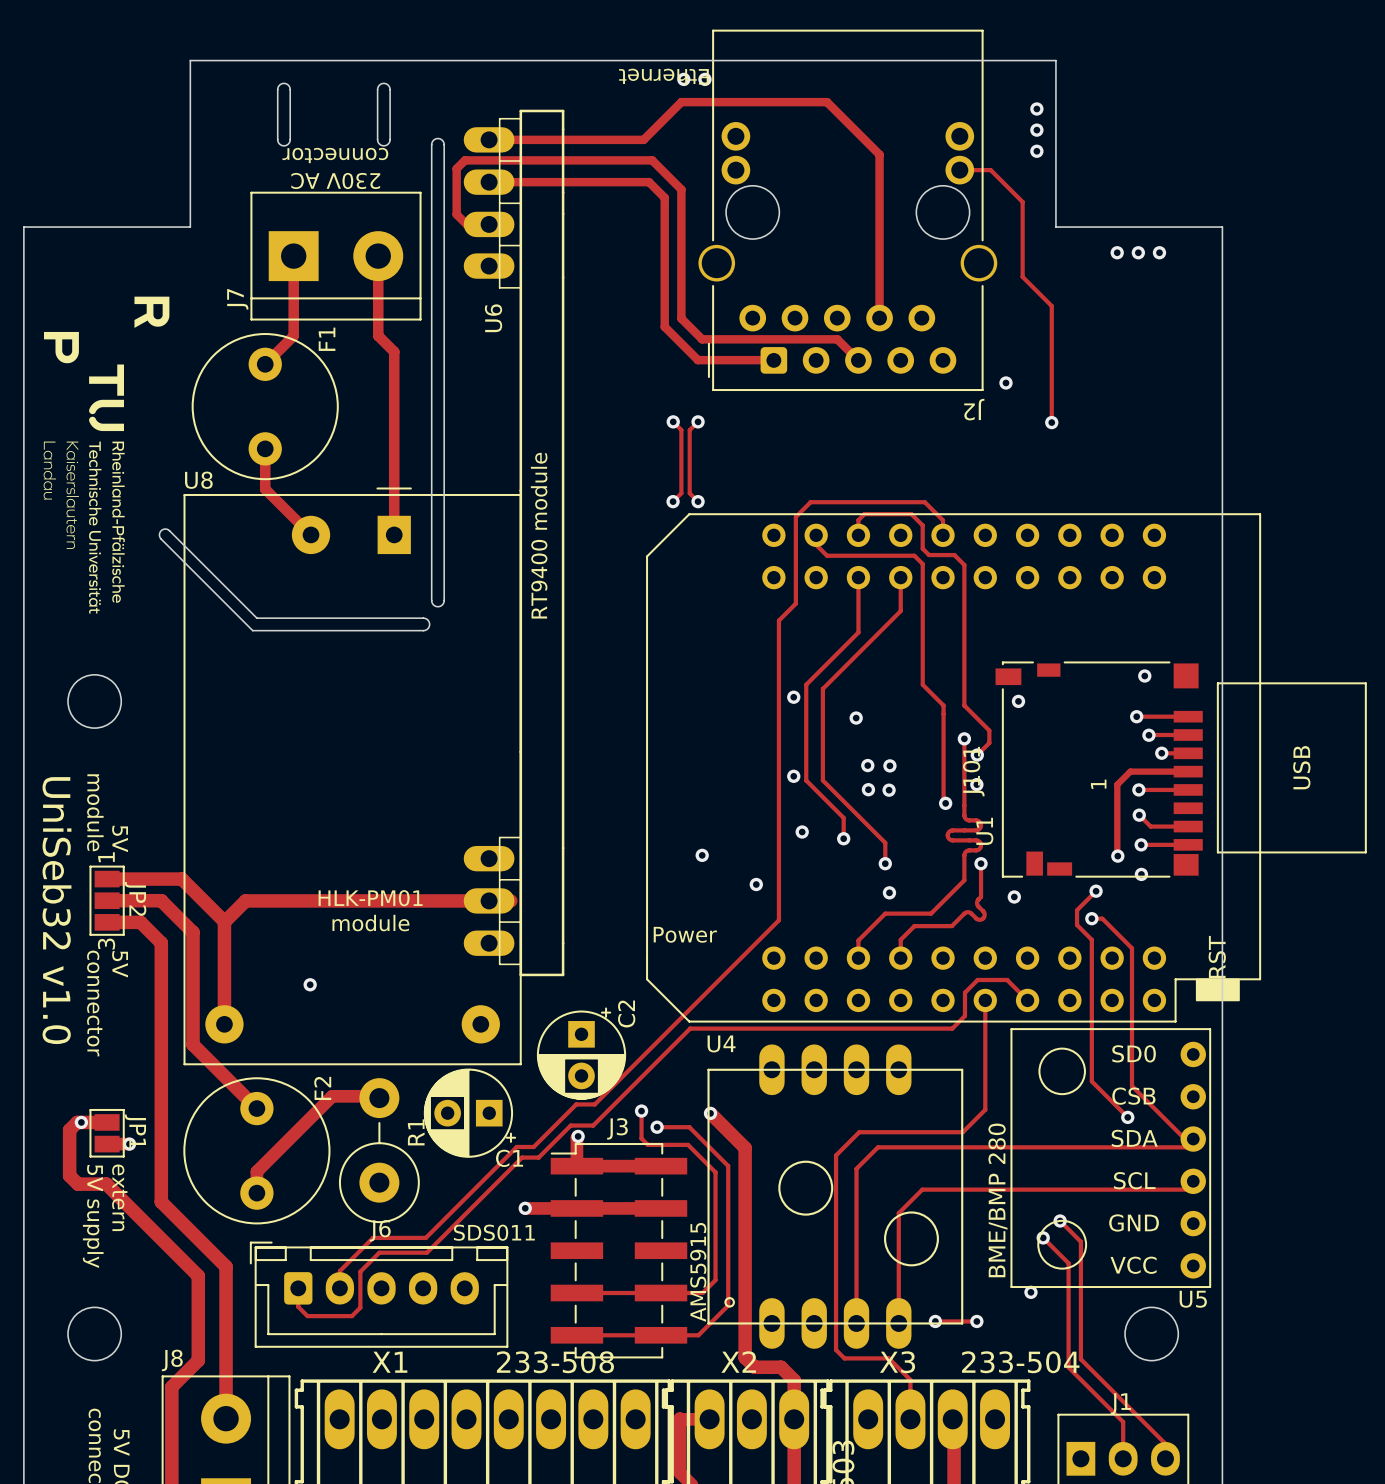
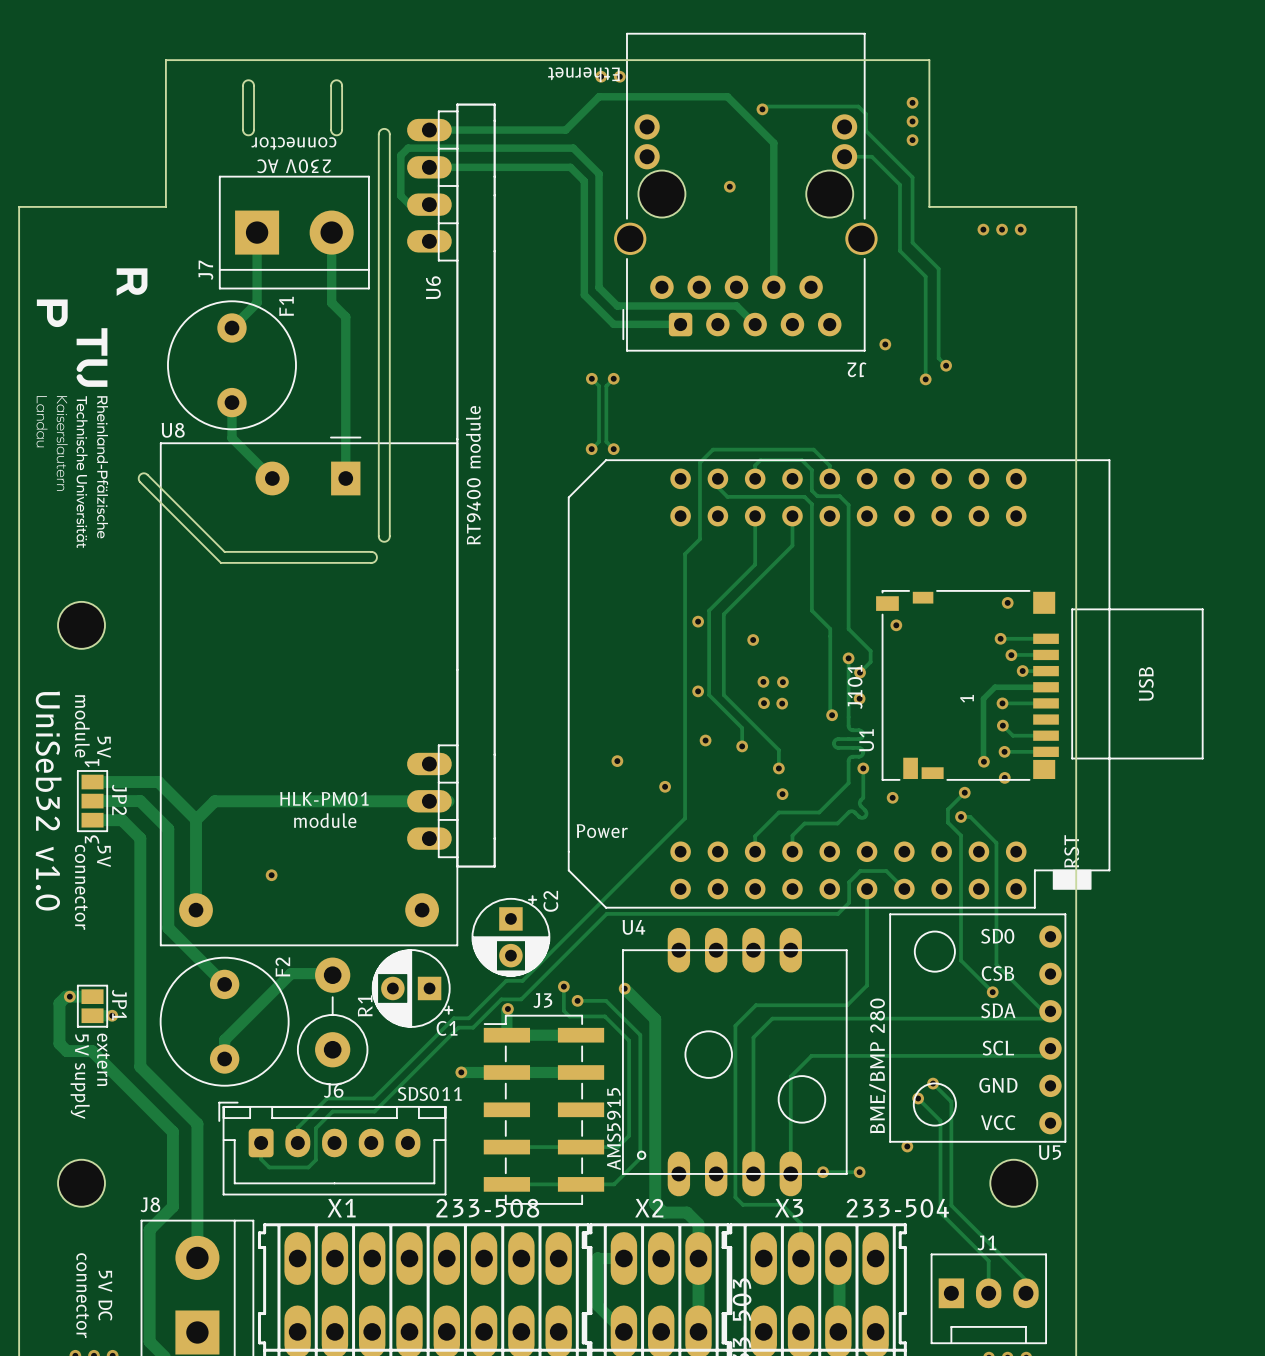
track: none -> (762, 109) (765, 106) (858, 106) (865, 114) (865, 130) (912, 177) (912, 242) (938, 268) (938, 358) (946, 365)
via: none -> (762, 109)
via: none -> (729, 186)
via: none -> (946, 365)

